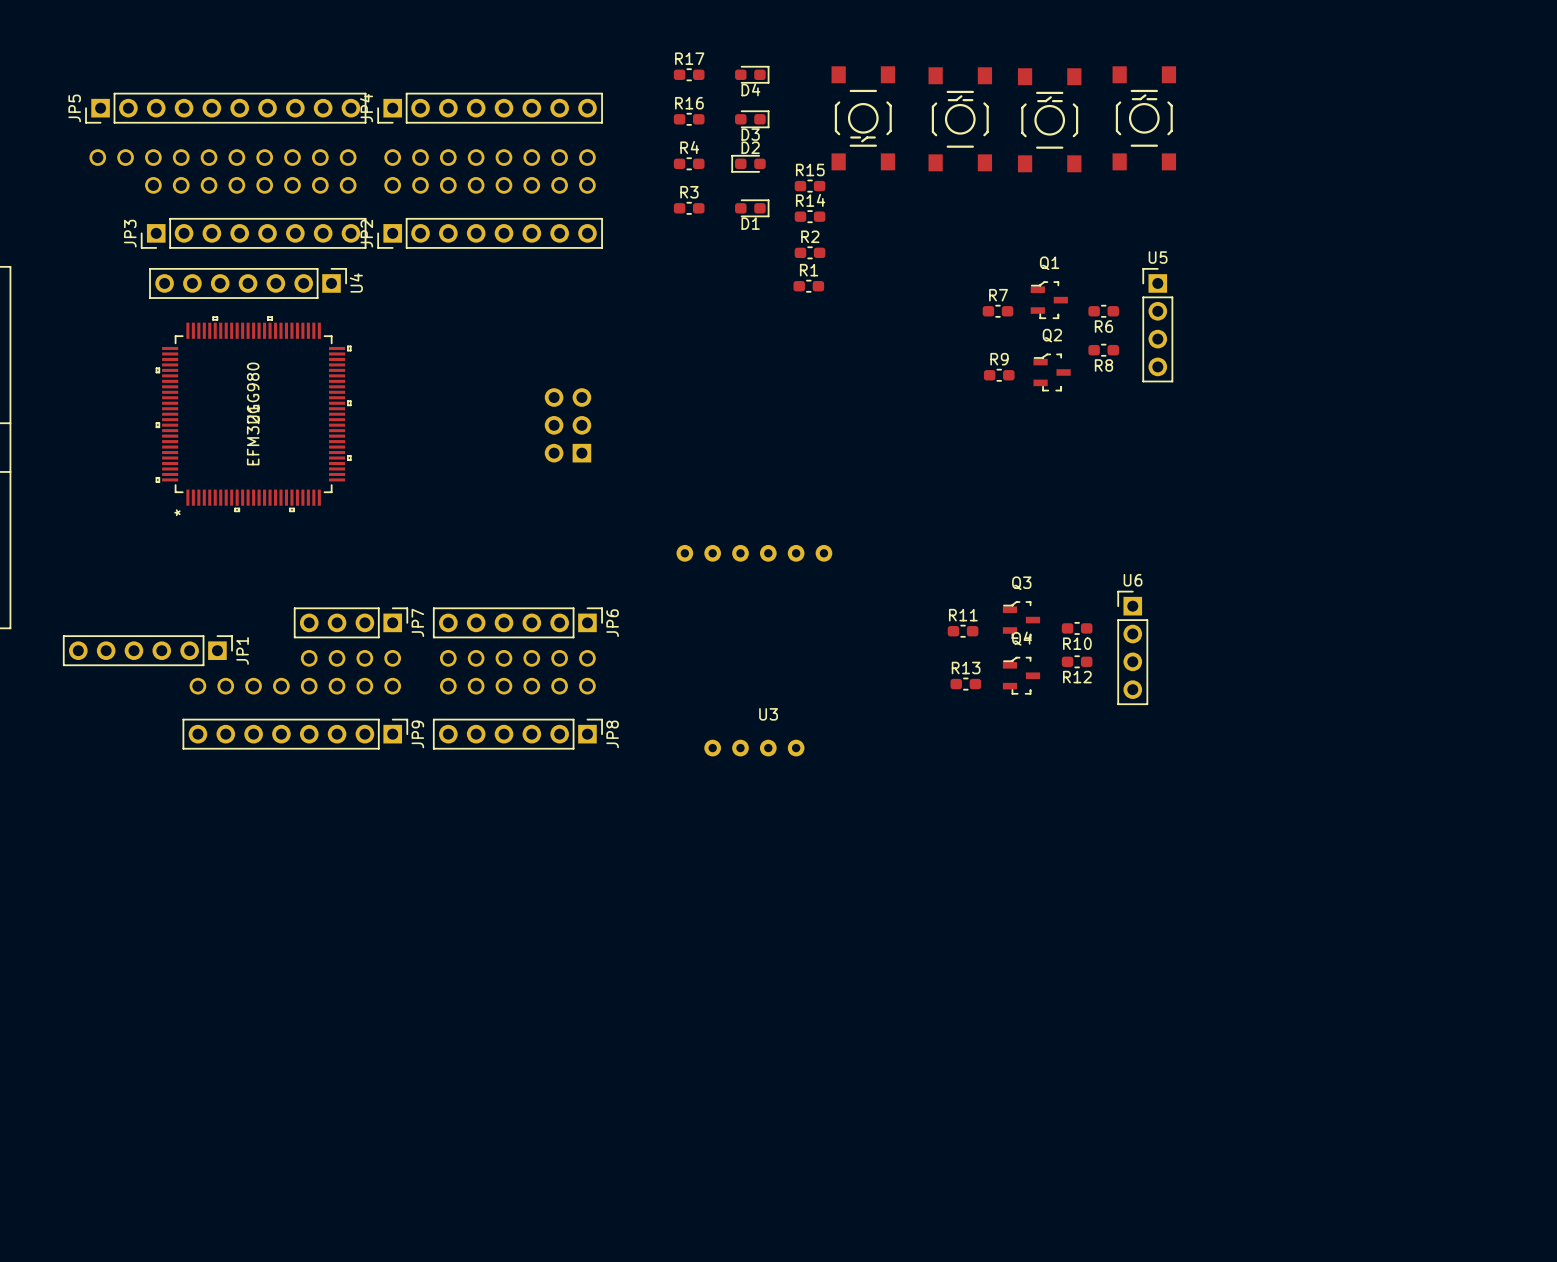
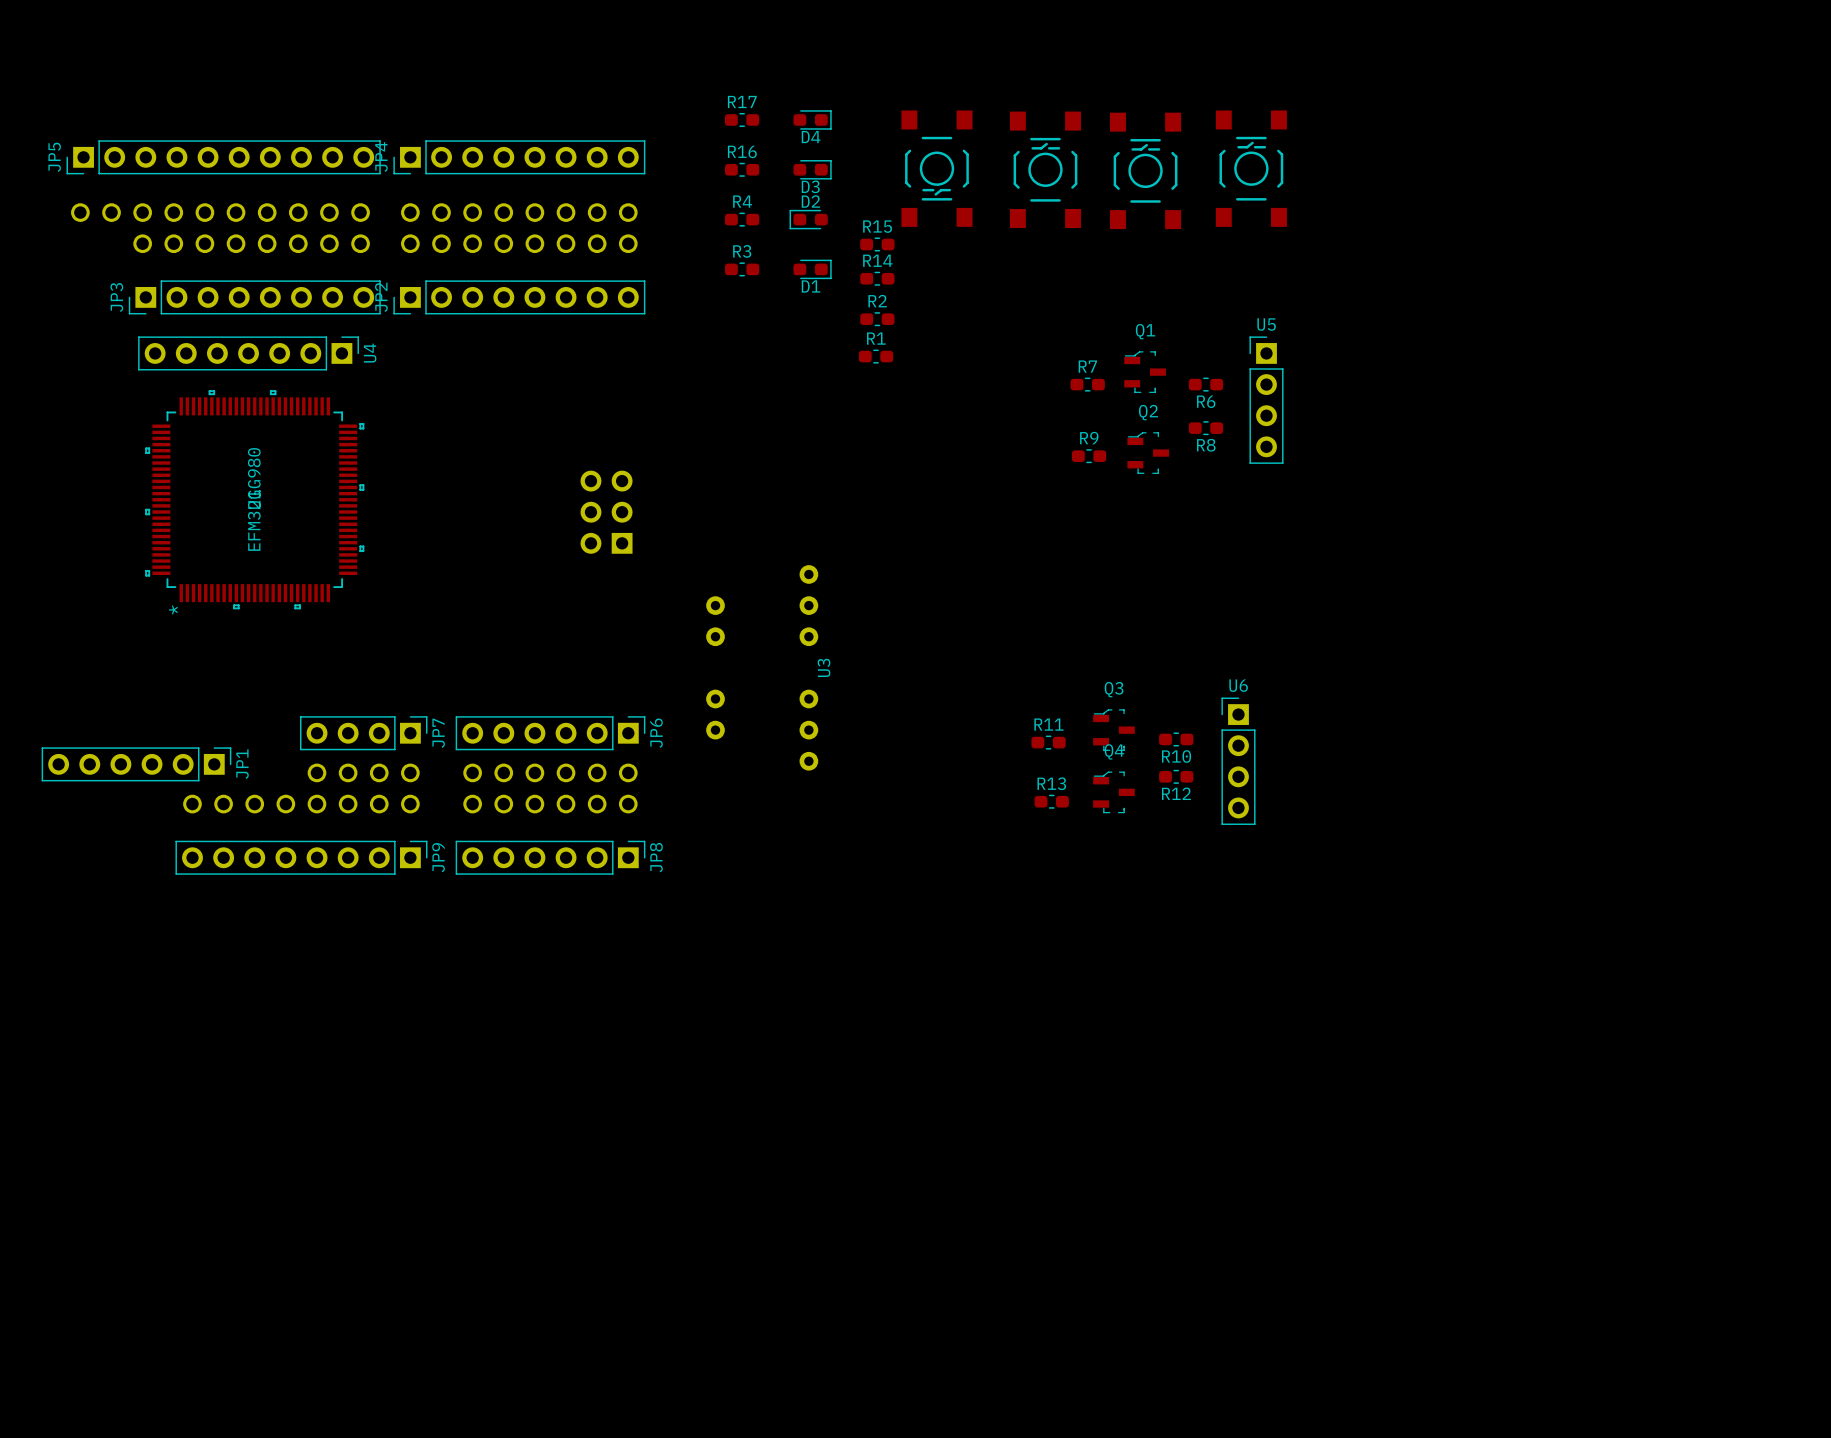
U3 footprint: [676, 544, 833, 757] -> [706, 565, 819, 771]
U3 name position: U3 (768, 714) -> U3 (823, 667)

